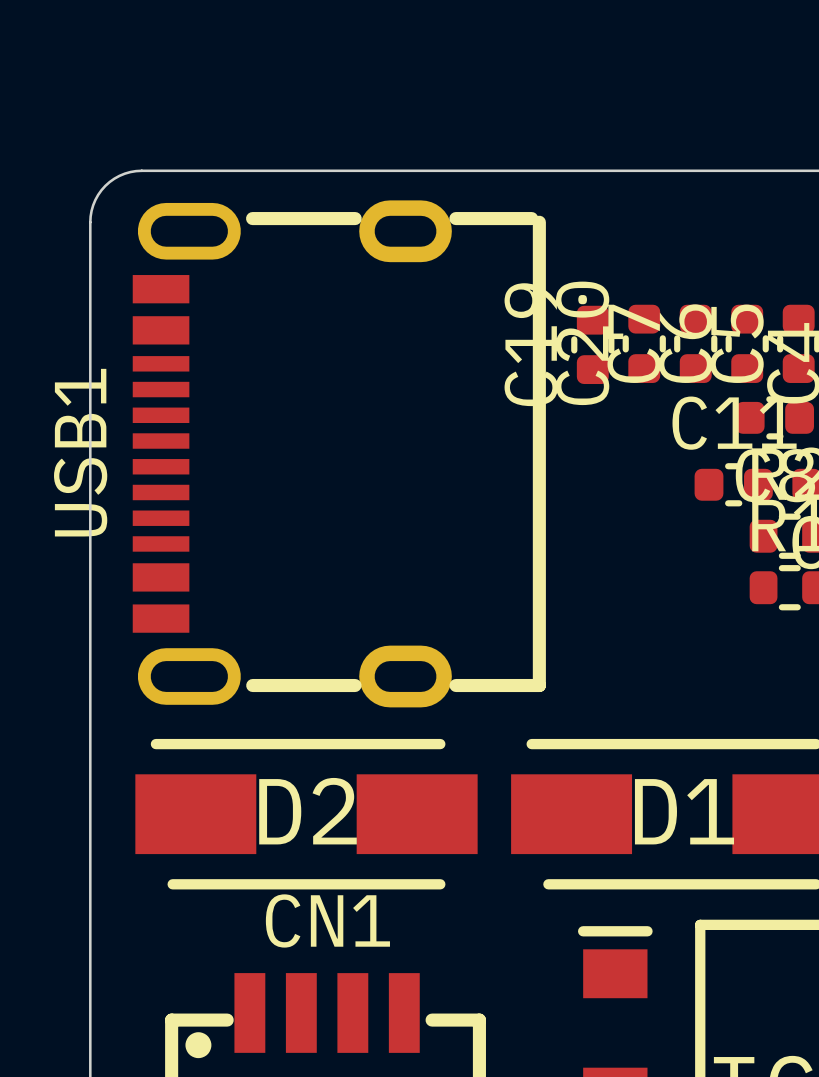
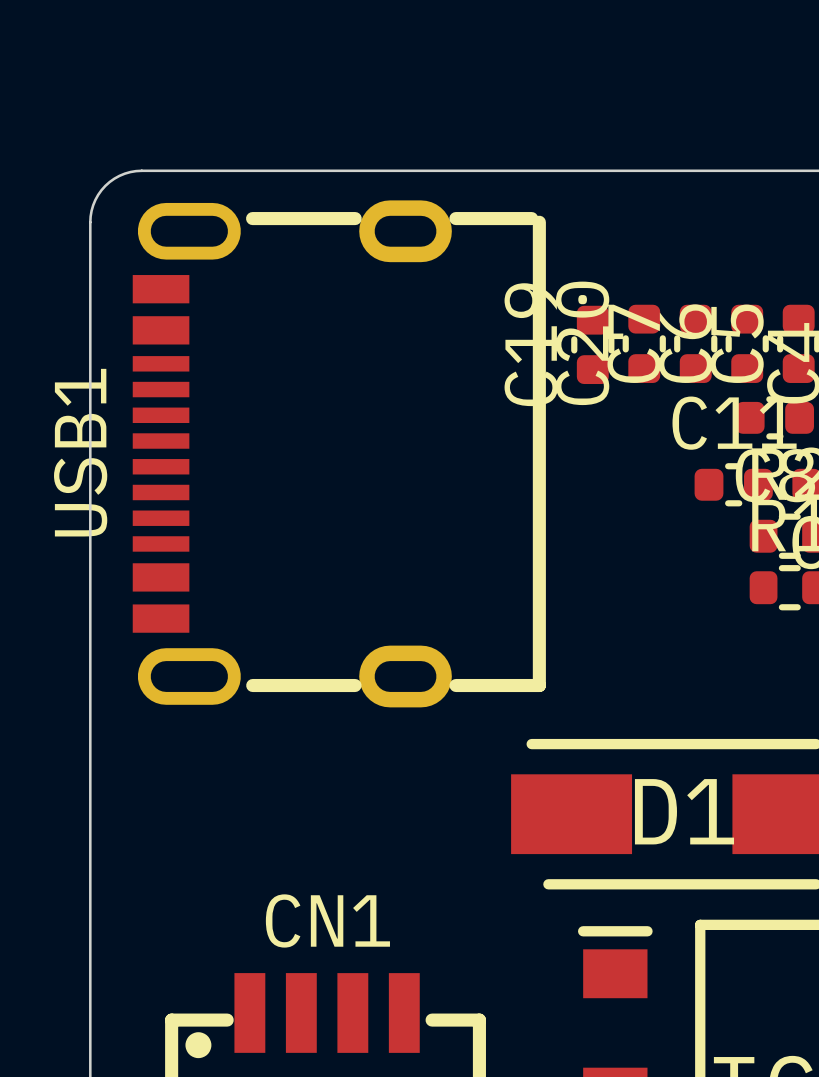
D2: (306, 814) -> none

